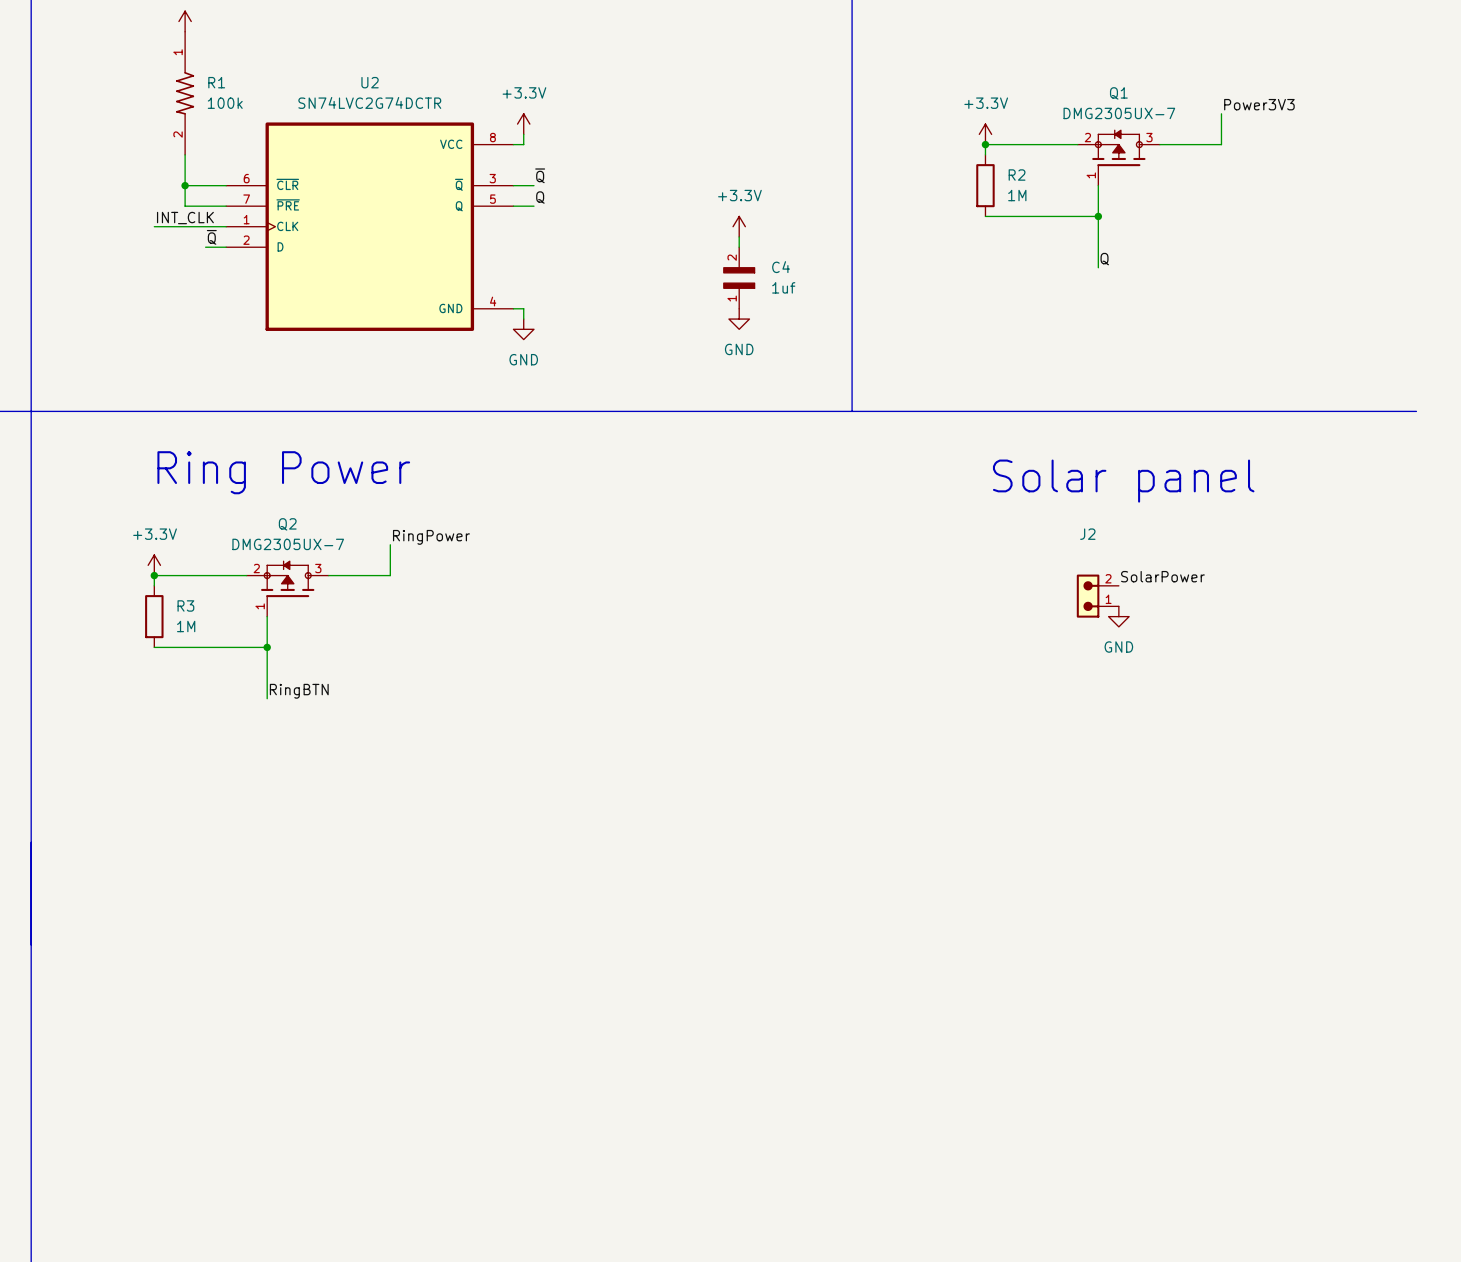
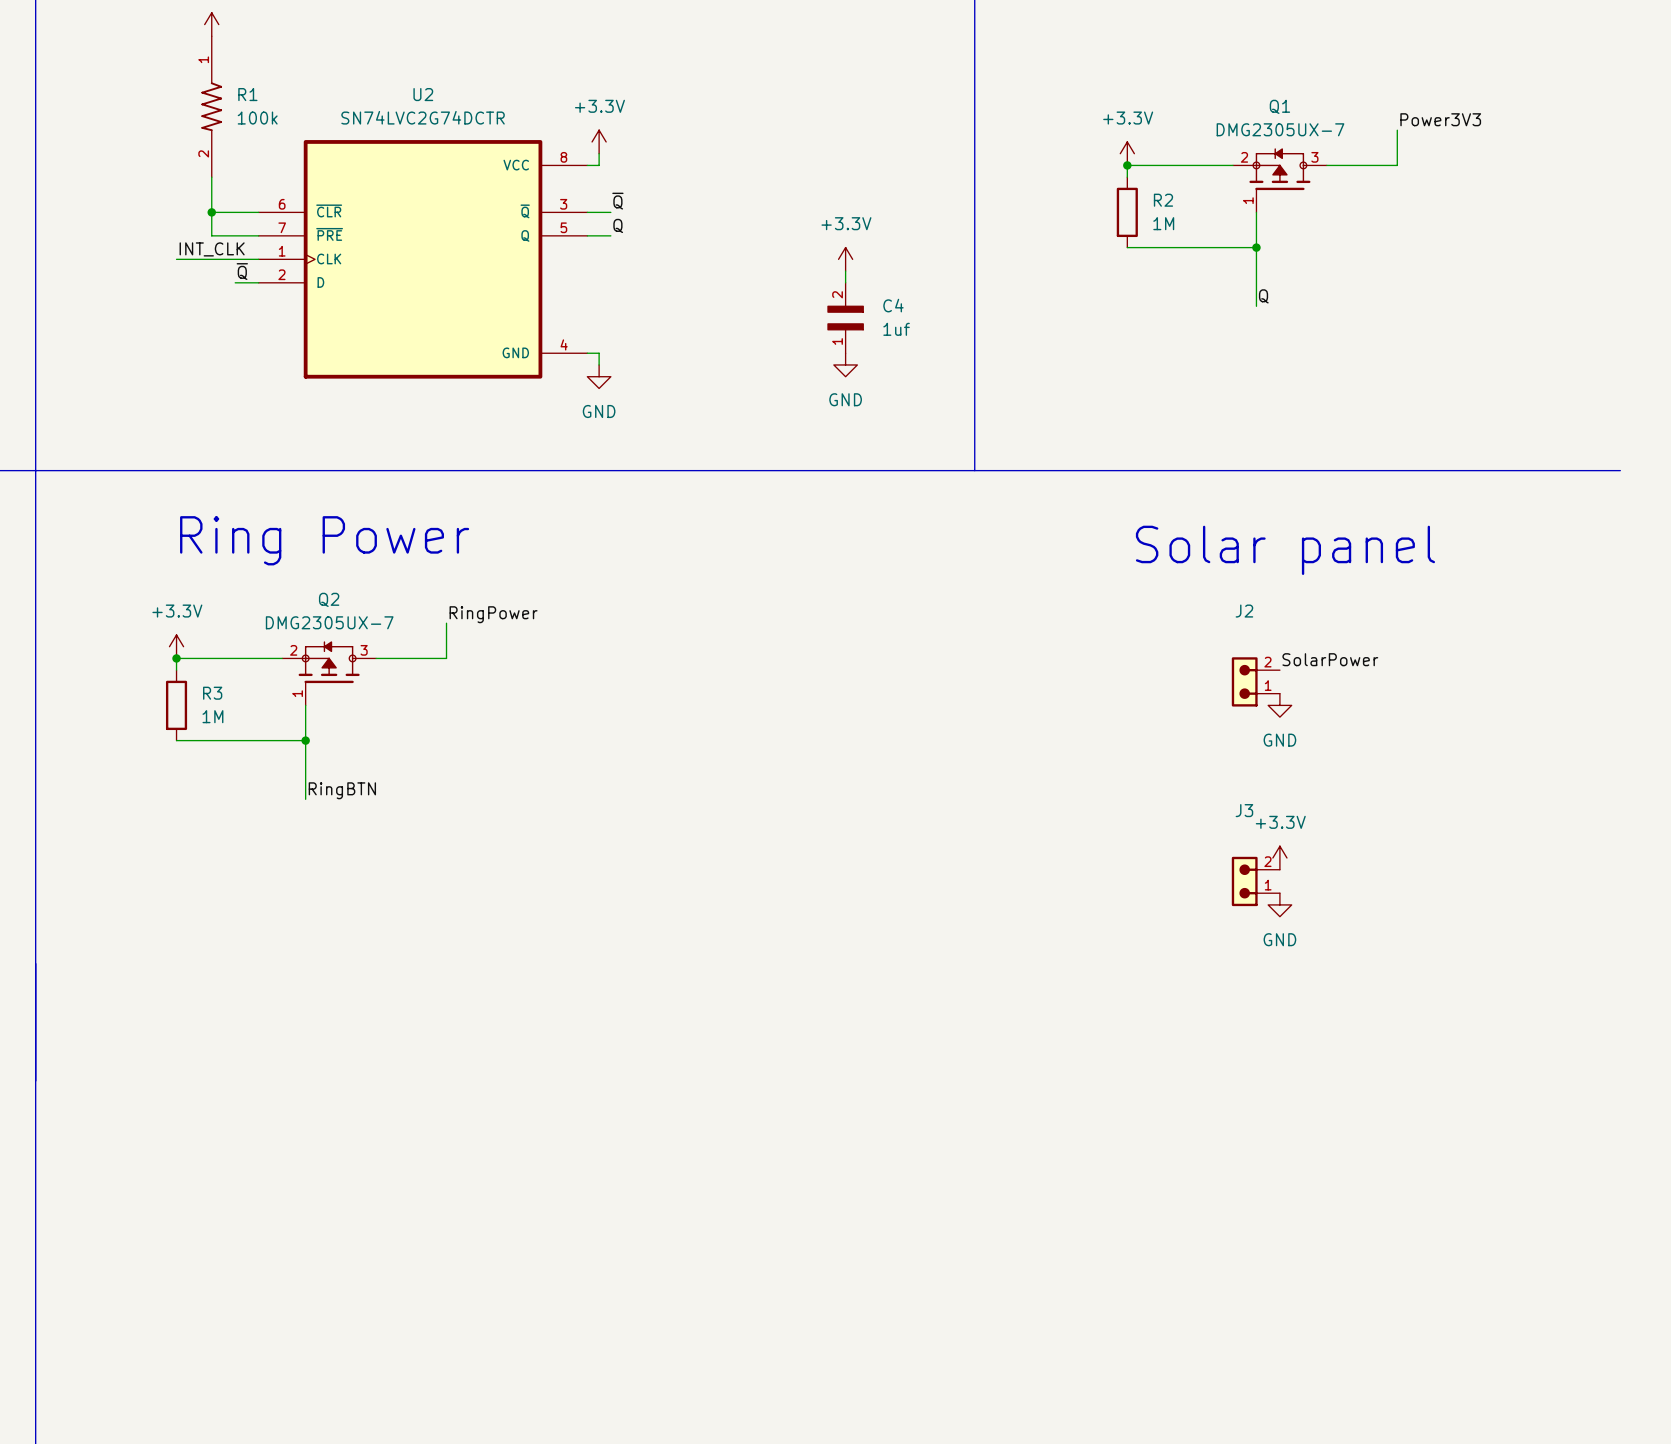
power symbol: none -> +3.3V (1279, 857)
J3: none -> (1255, 881)
power symbol: none -> GND (1279, 904)

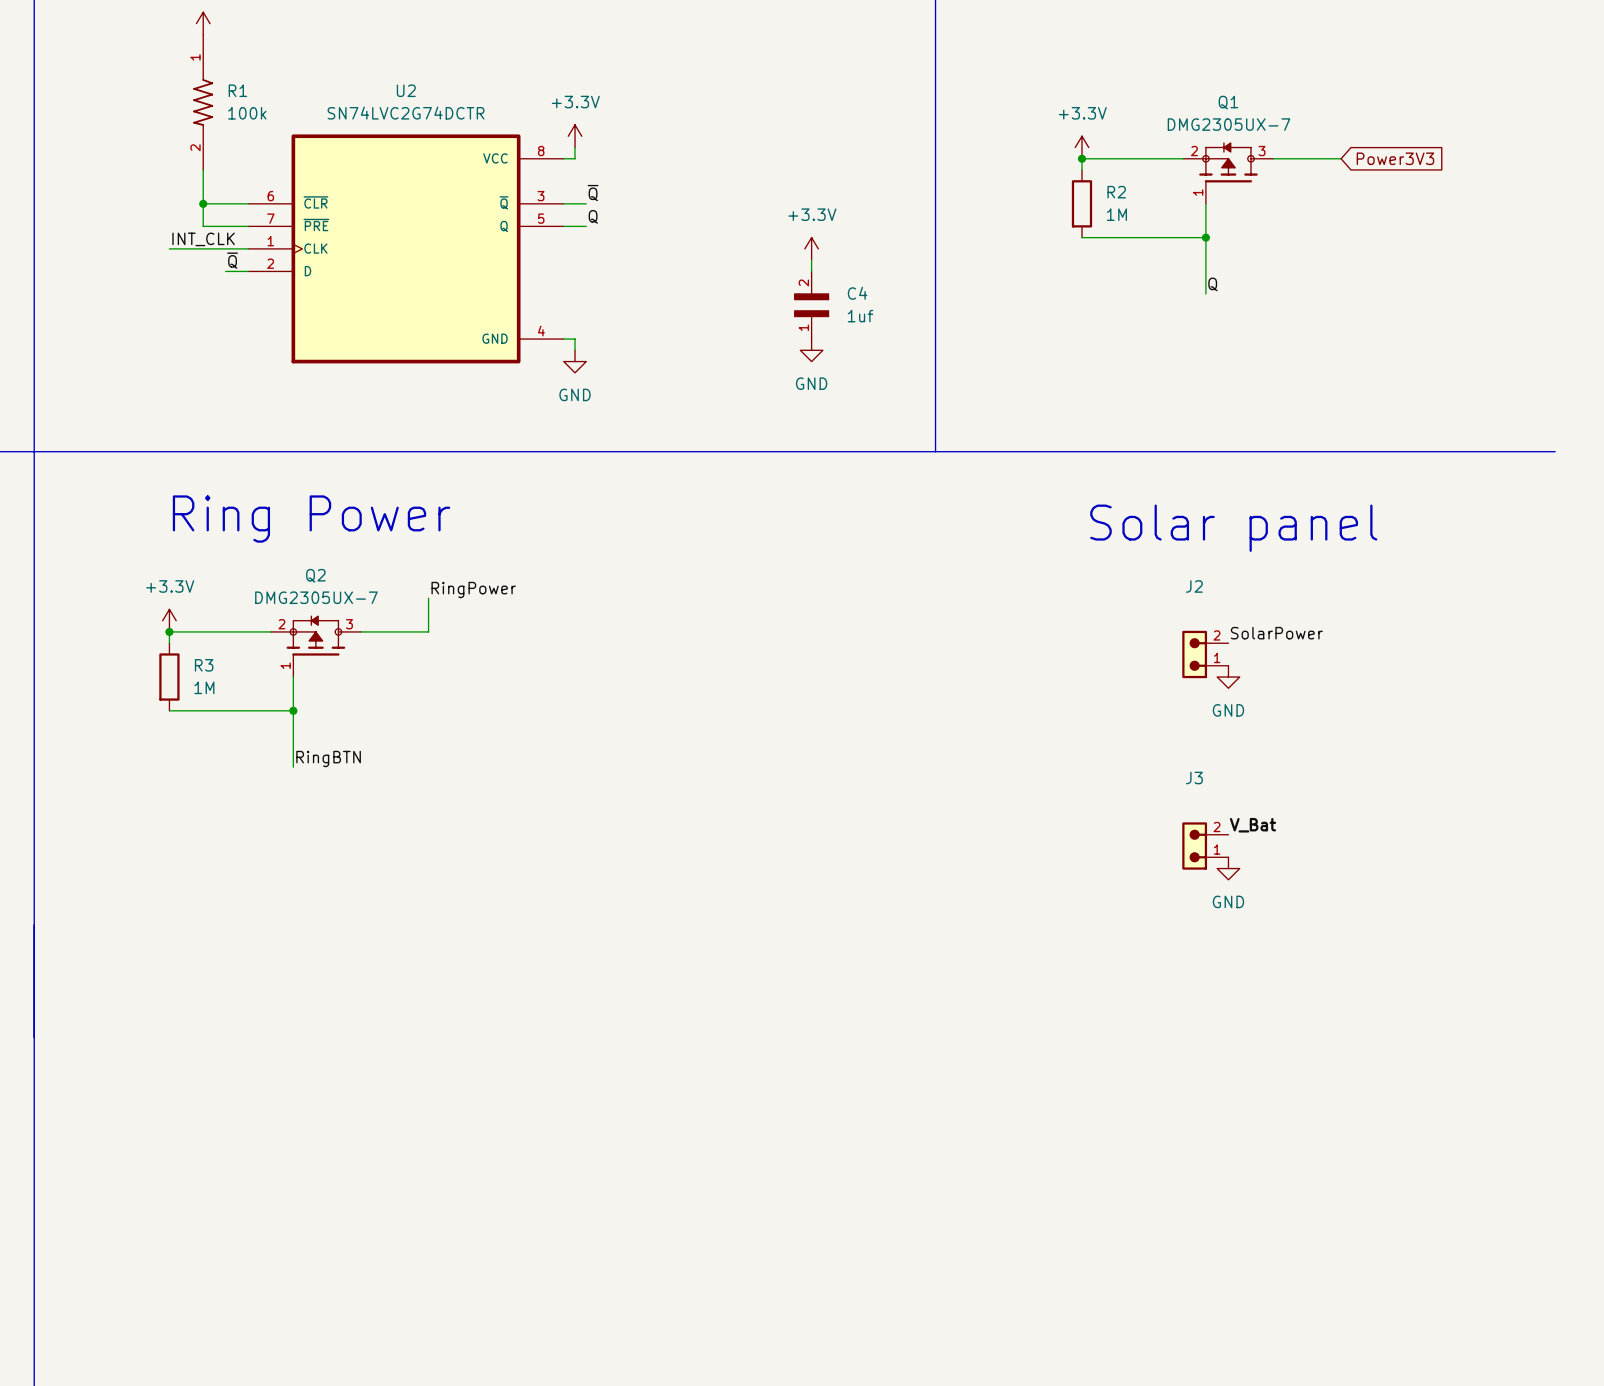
label: Power3V3 (1440, 119) -> none
wire: (1397, 130) (1397, 165) -> none
global label: none -> Power3V3 (1395, 158)
power symbol: +3.3V (1279, 857) -> none
label: none -> V_Bat (1253, 825)

